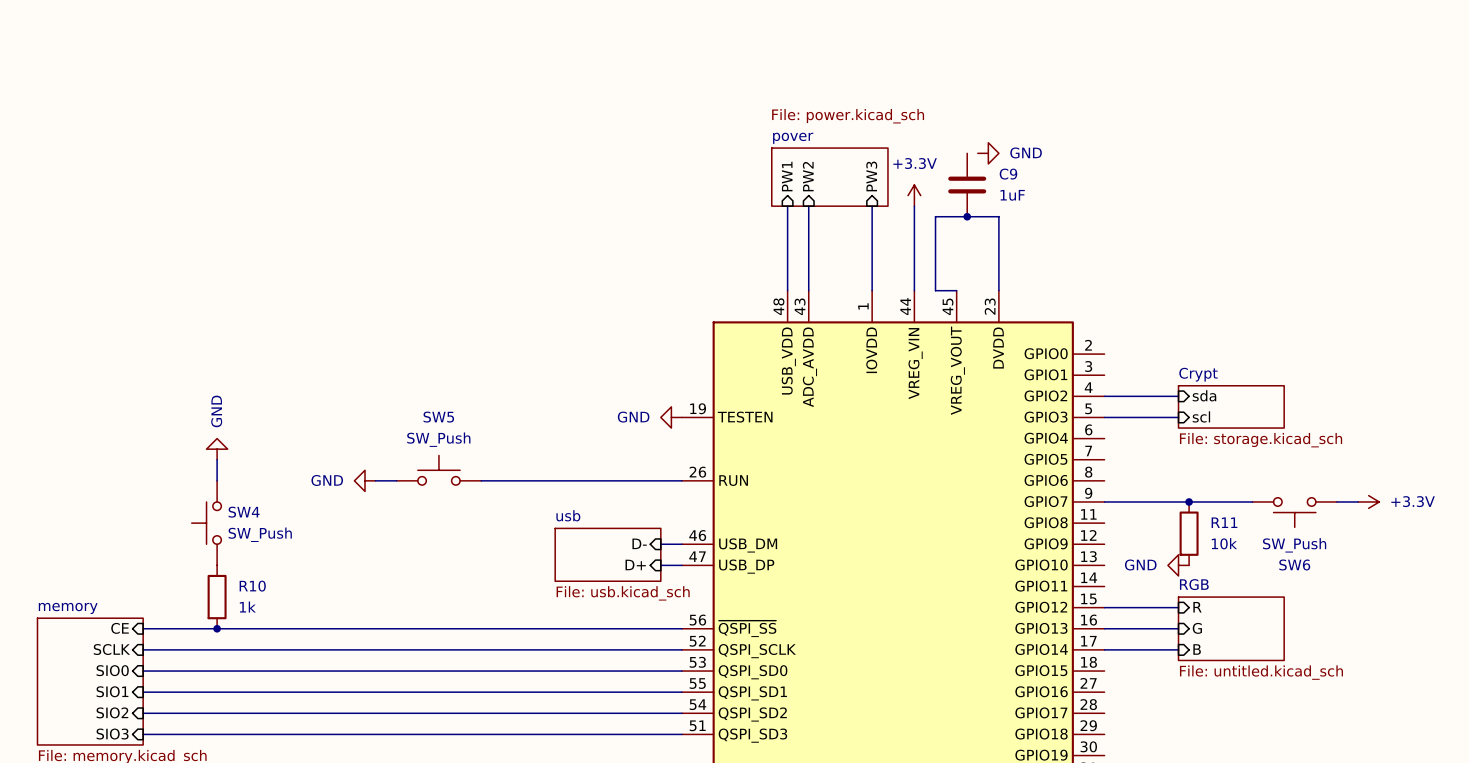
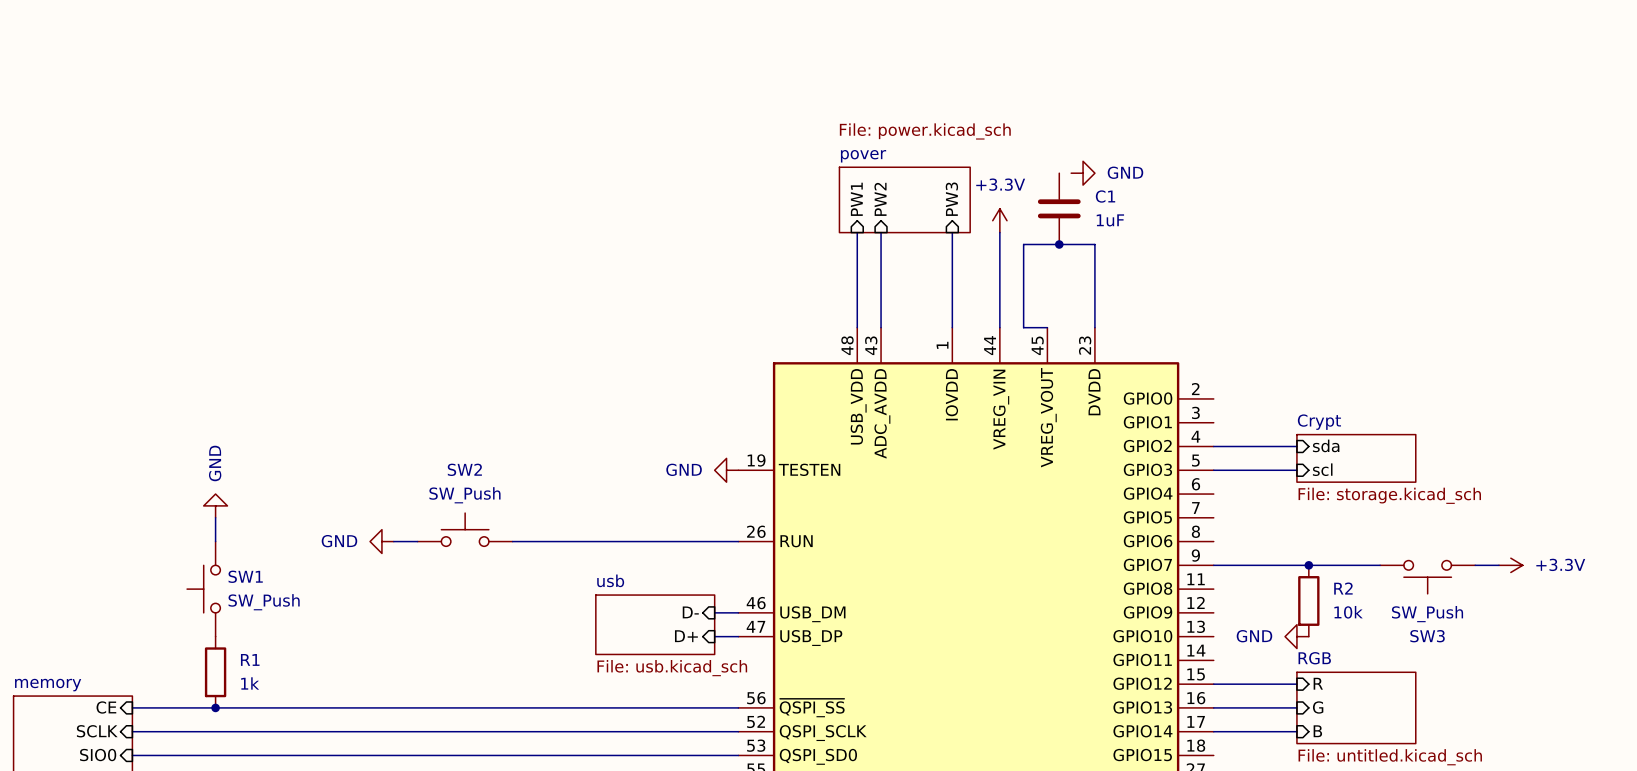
C9 name: C9 (1008, 174) -> C1 (1105, 196)
SW5 name: SW5 (438, 417) -> SW2 (464, 469)
SW4 name: SW4 (244, 512) -> SW1 (245, 576)
R11 name: R11 (1224, 522) -> R2 (1343, 588)
SW6 name: SW6 (1294, 564) -> SW3 (1427, 636)
R10 name: R10 (252, 586) -> R1 (250, 659)

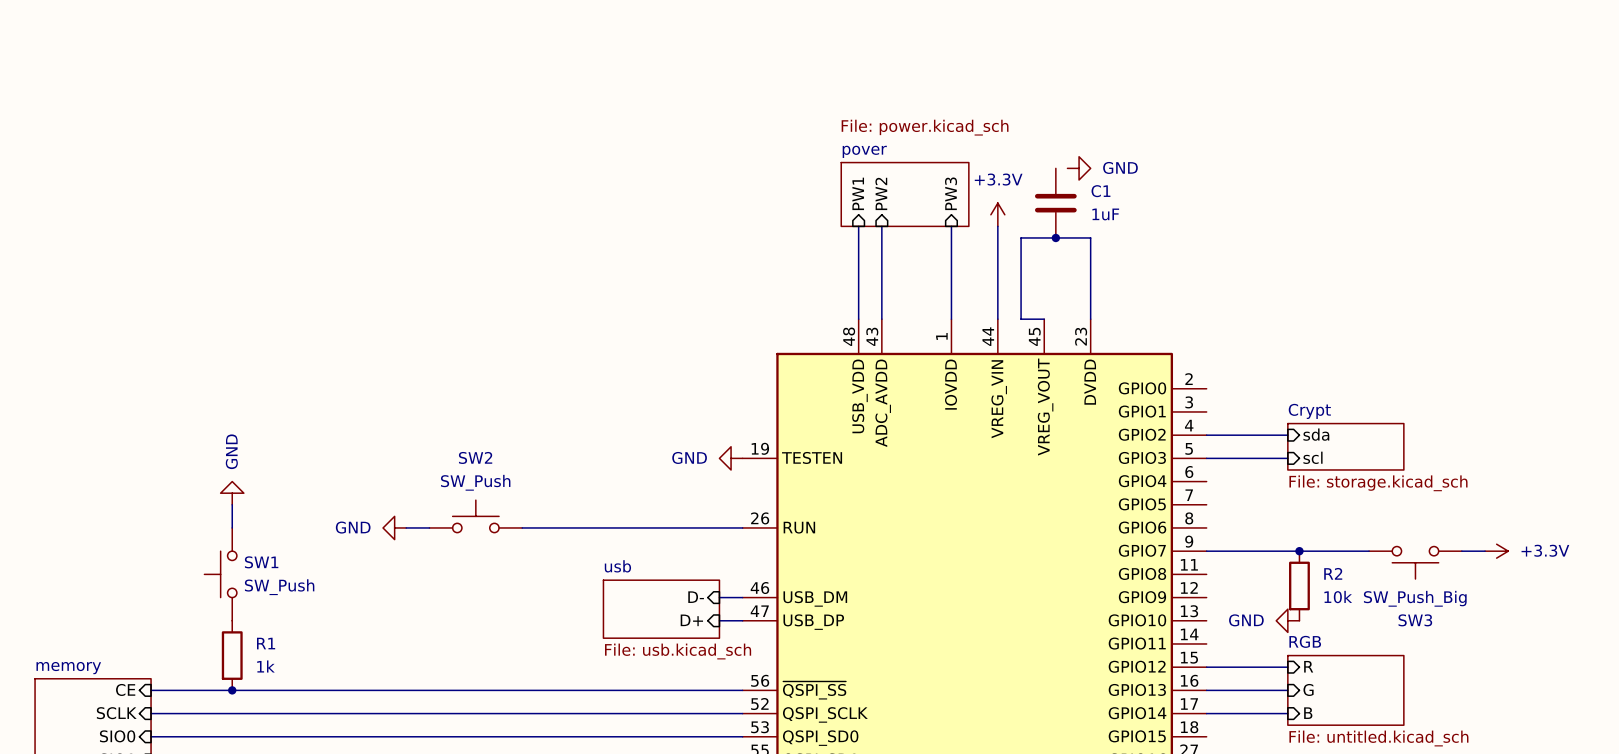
SW3 value: SW_Push (1427, 614) -> SW_Push_Big (1415, 598)

